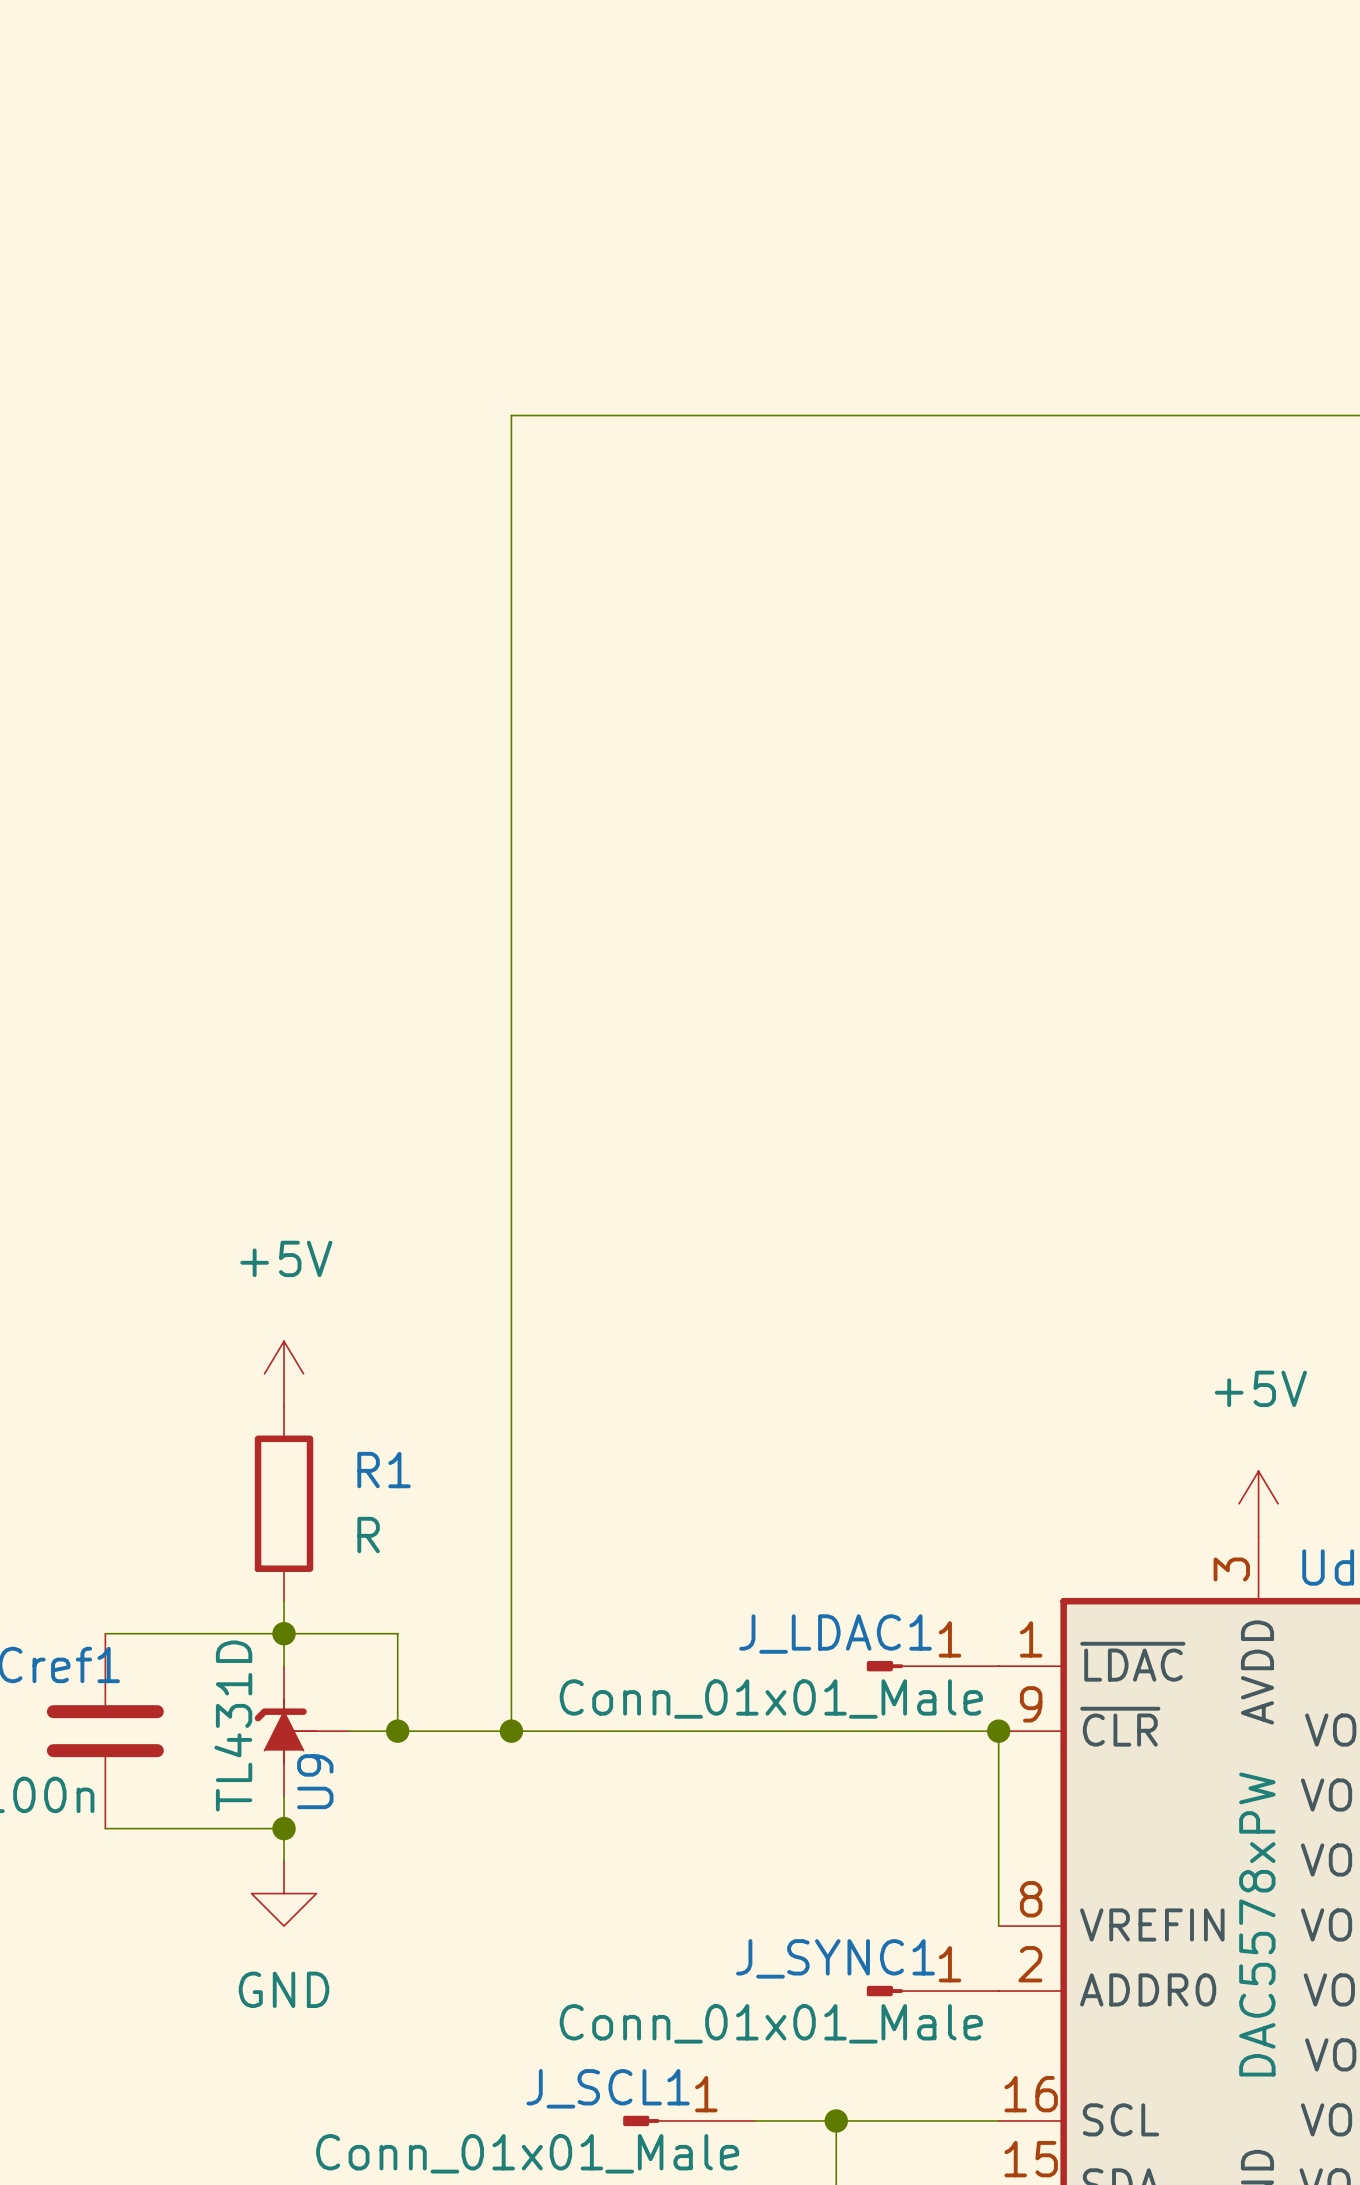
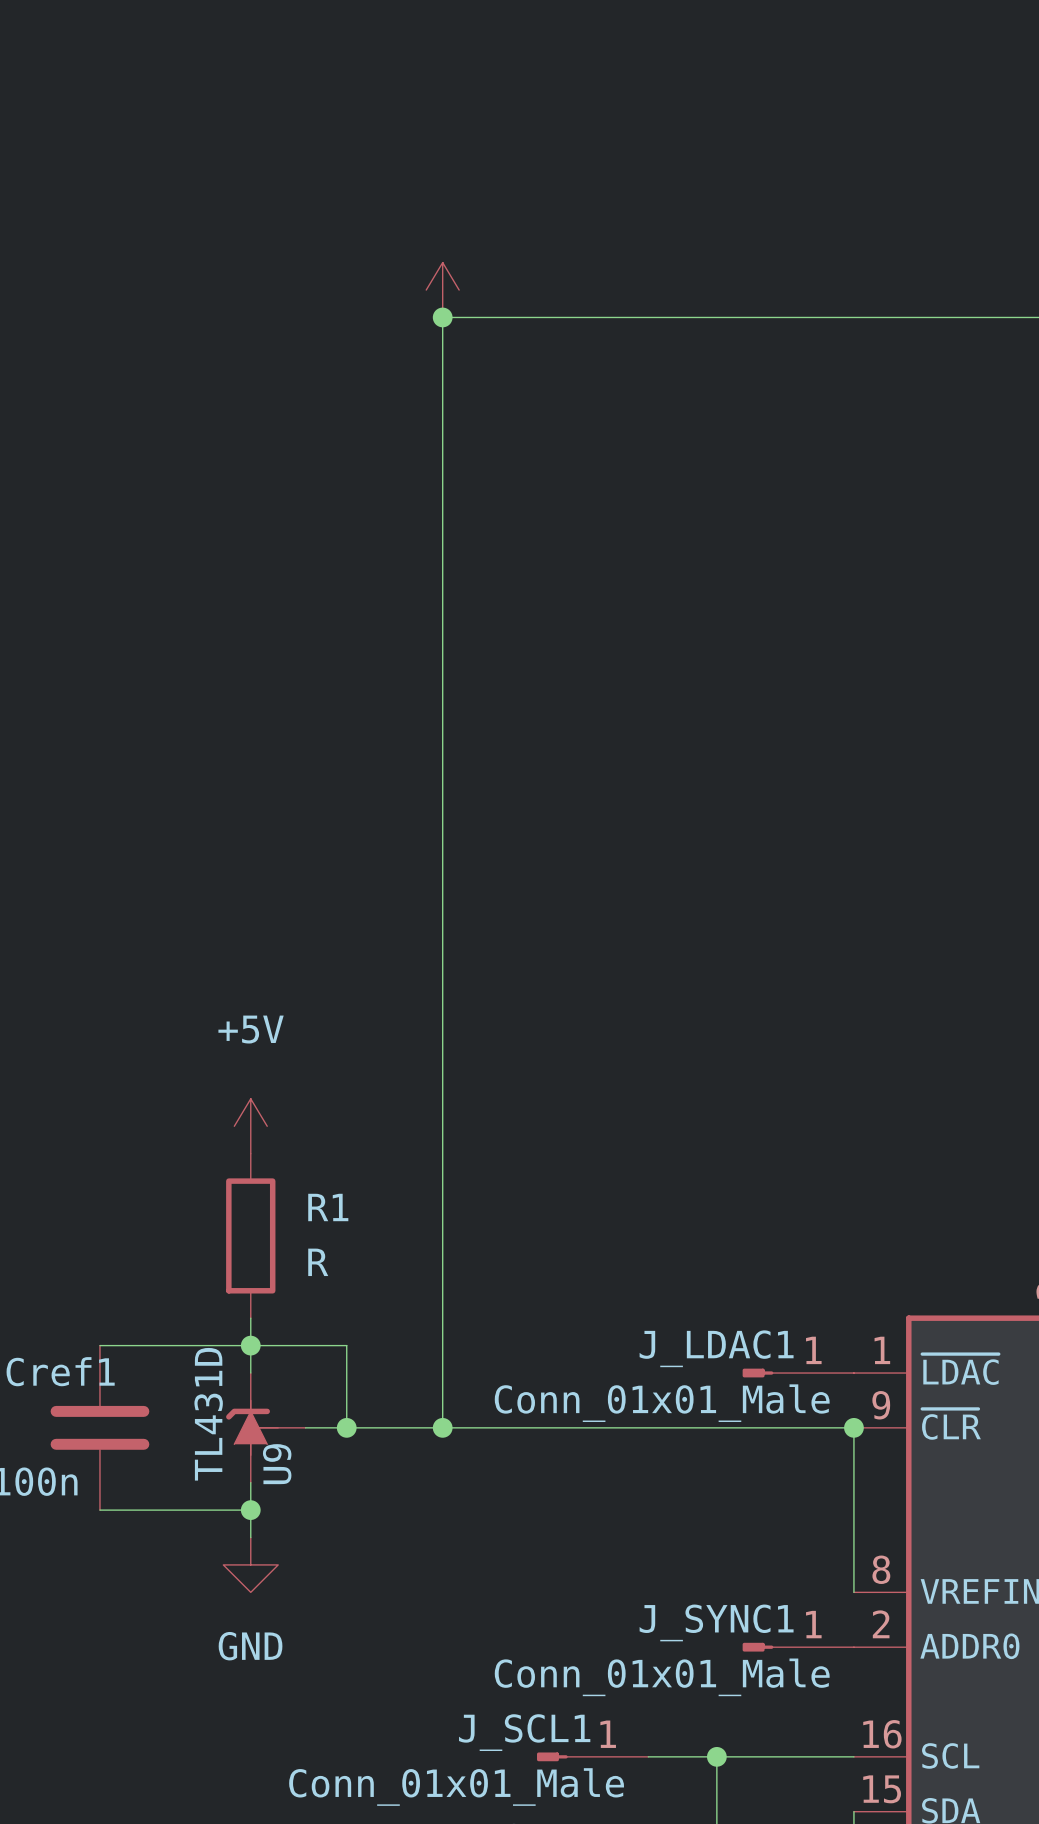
power symbol: none -> (442, 290)
junction: none -> (442, 317)

